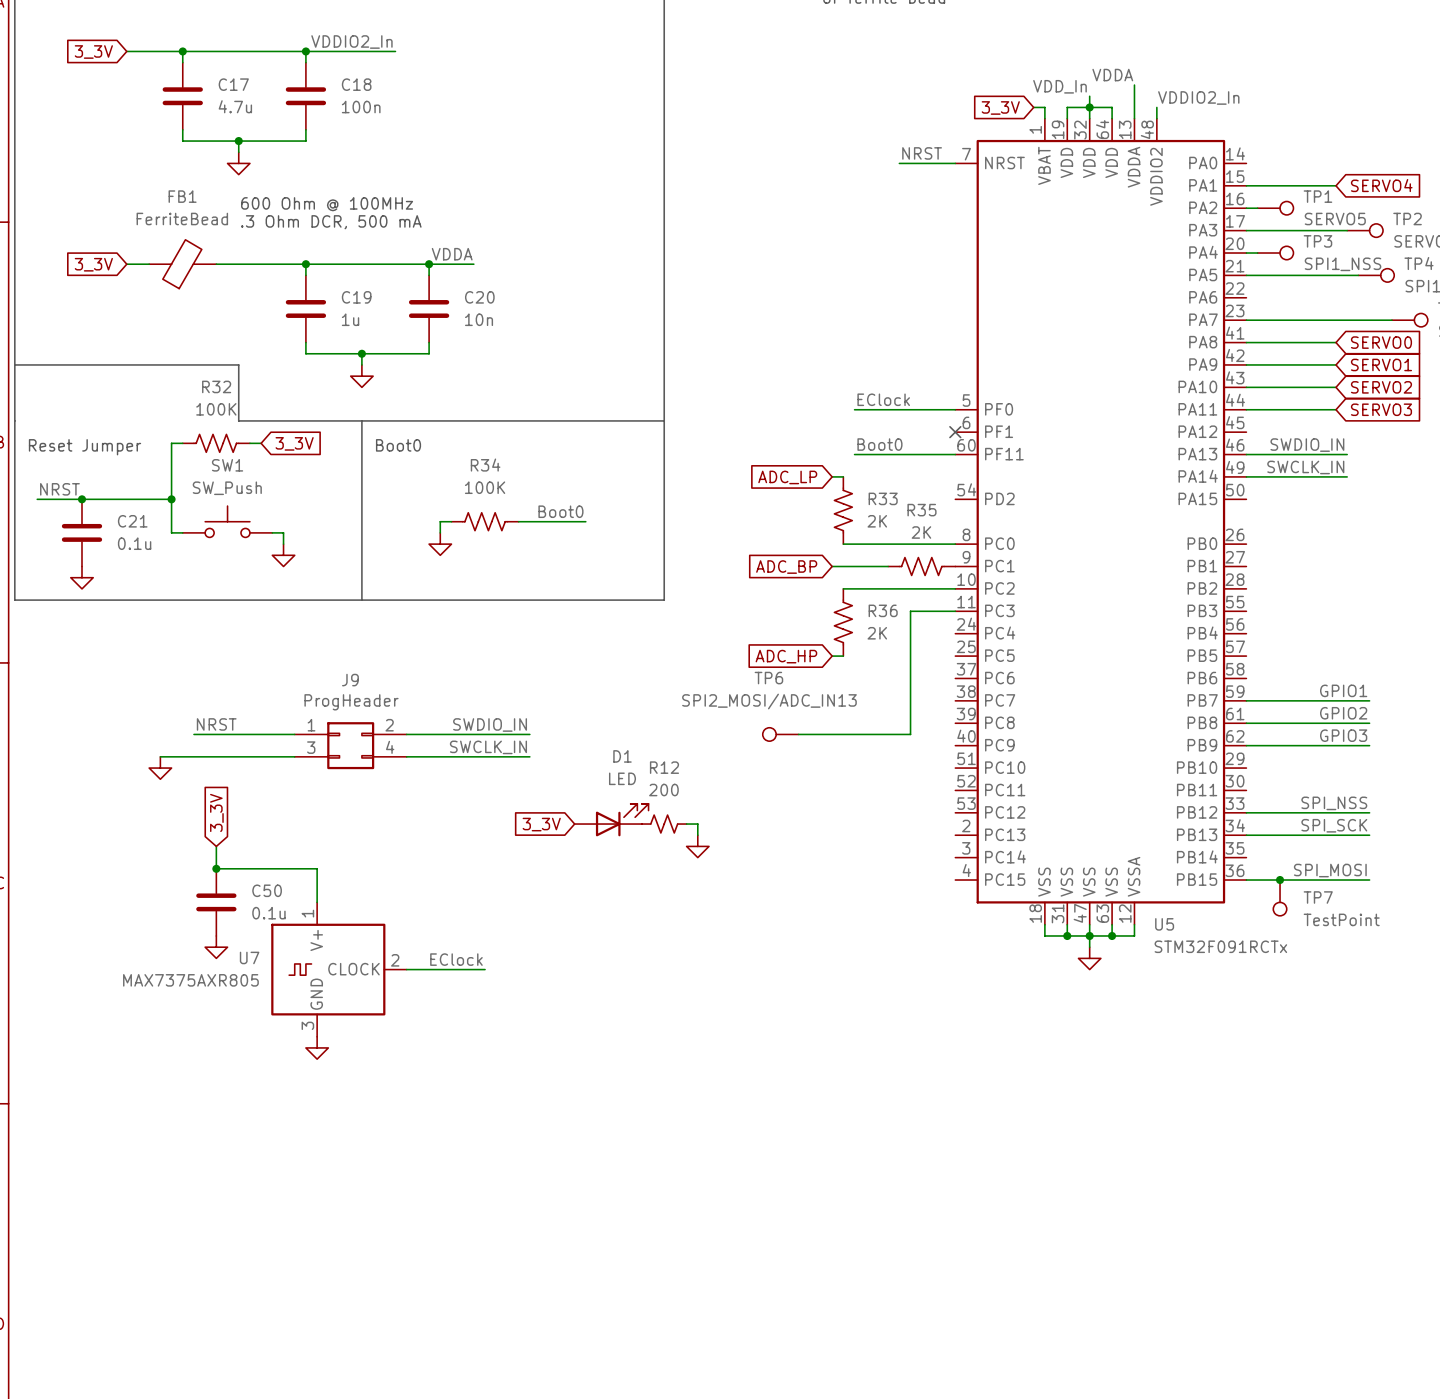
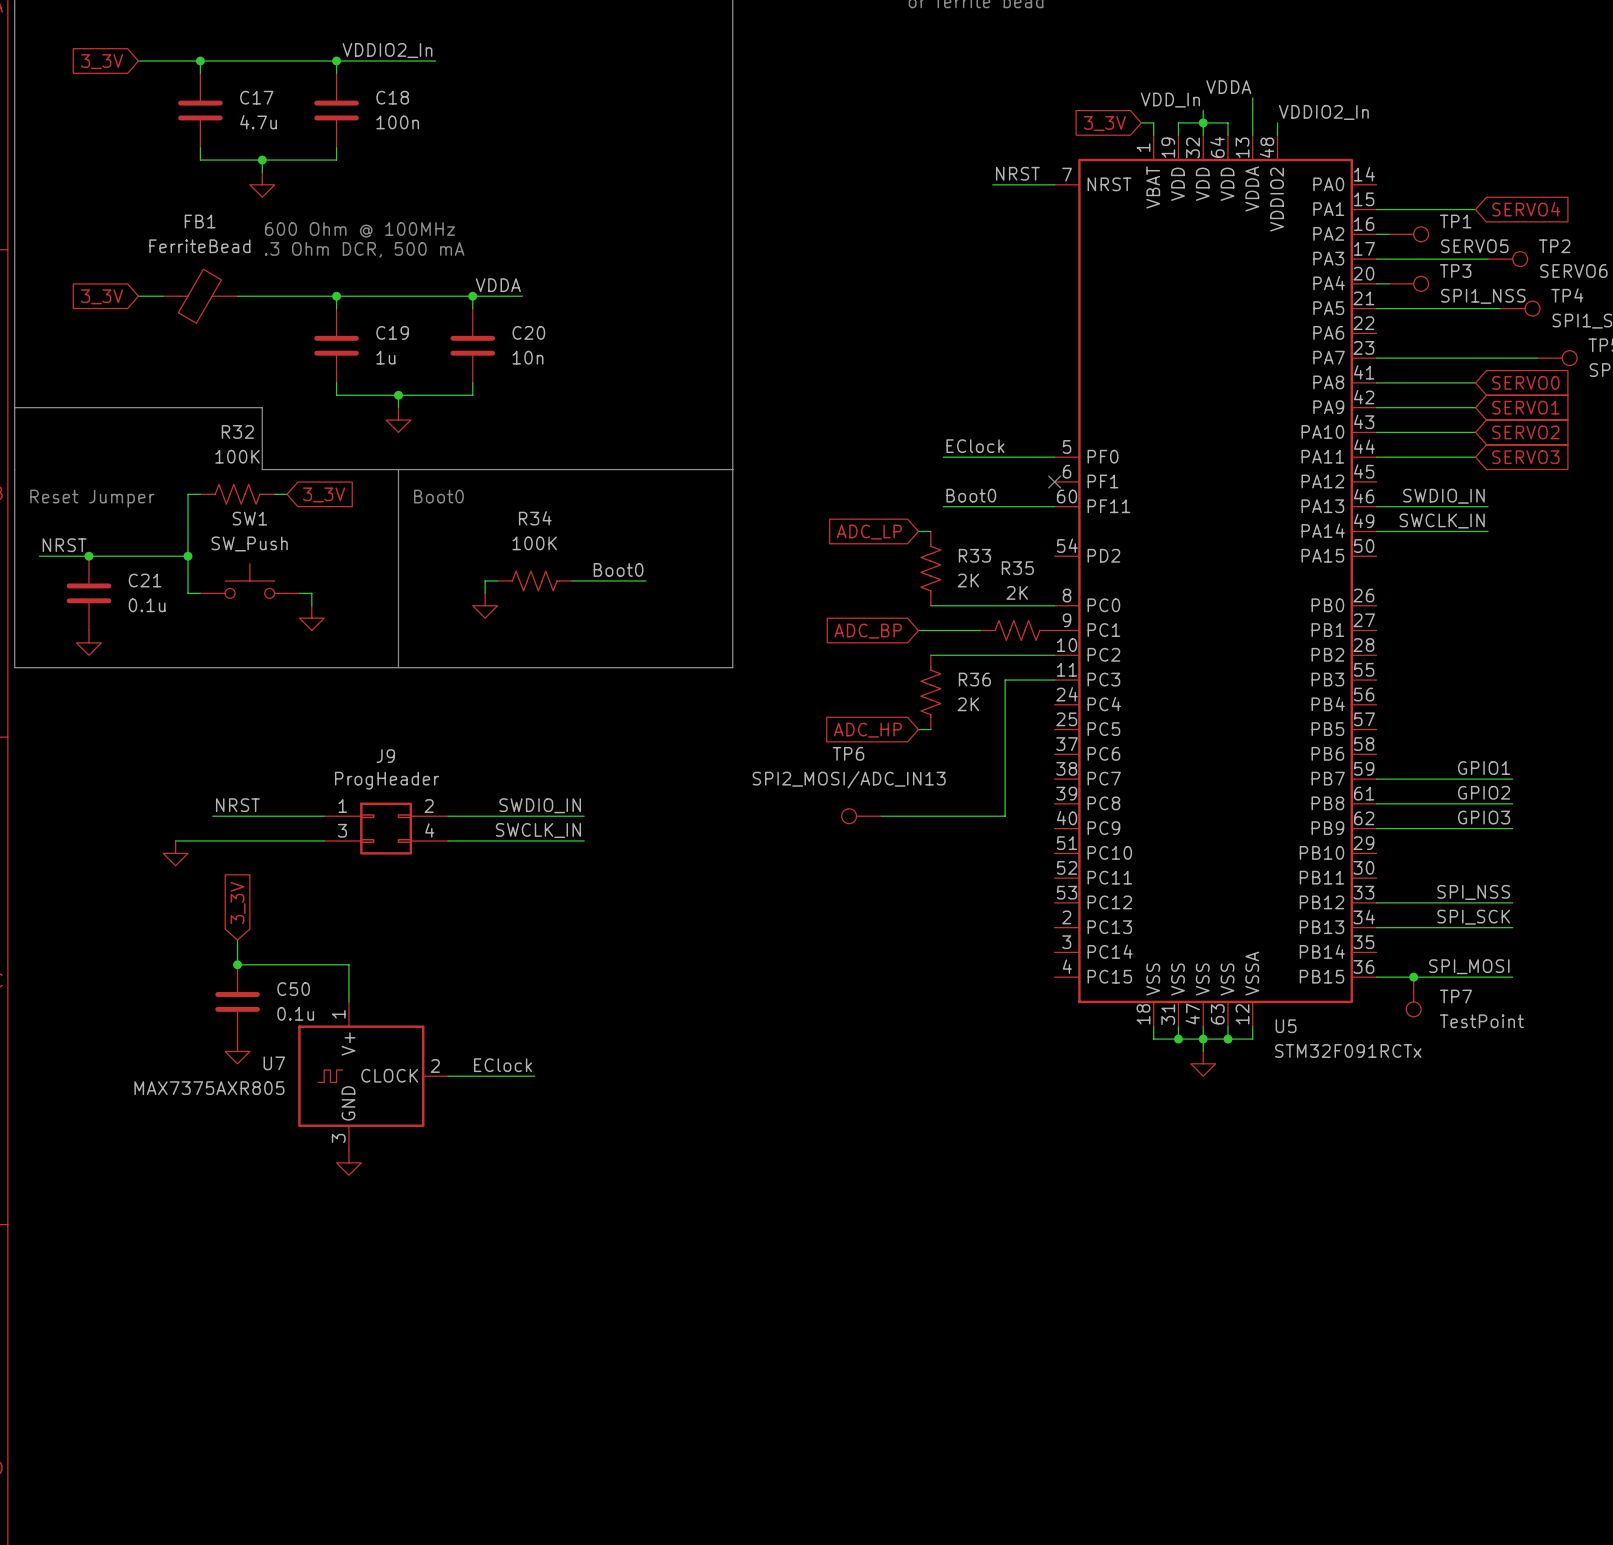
D1: LED (611, 820) -> none
global label: 3_3V (541, 824) -> none
R12: 200 (664, 824) -> none
wire: (686, 824) (697, 824) (697, 835) -> none
power symbol: (697, 846) -> none

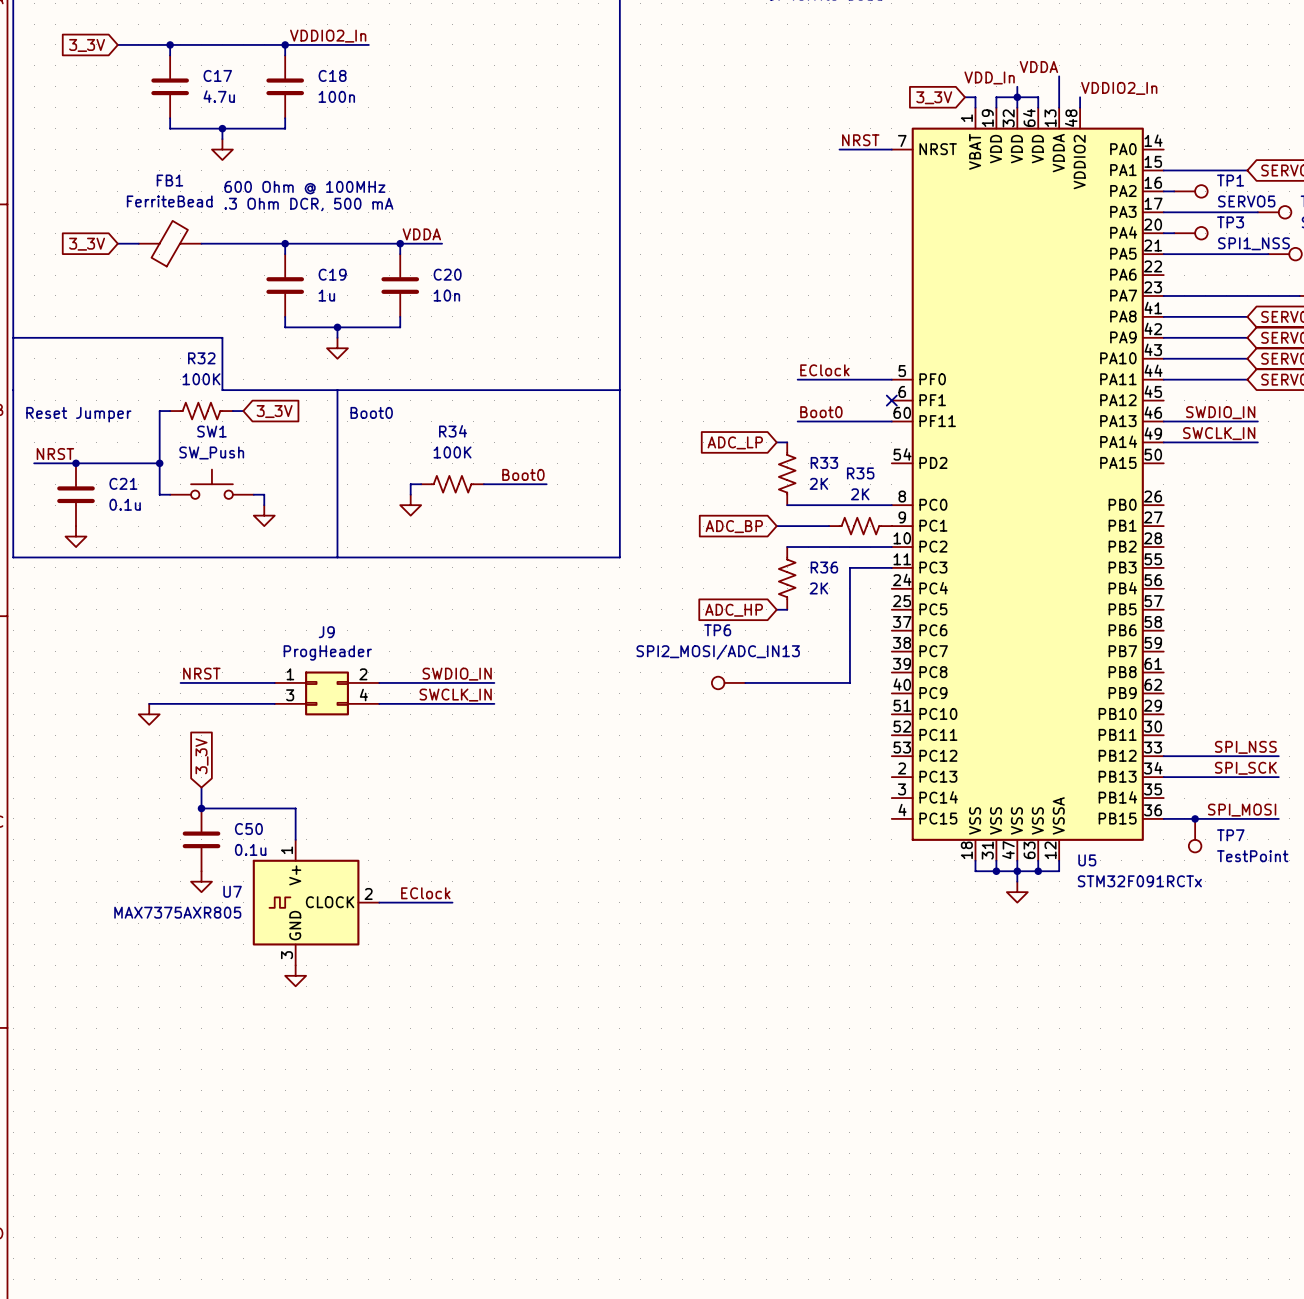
label: GPIO1 (1484, 768) -> none
wire: (1376, 779) (1512, 779) -> none
label: GPIO2 (1484, 792) -> none
wire: (1376, 803) (1512, 803) -> none
label: GPIO3 (1484, 817) -> none
wire: (1376, 828) (1512, 828) -> none

